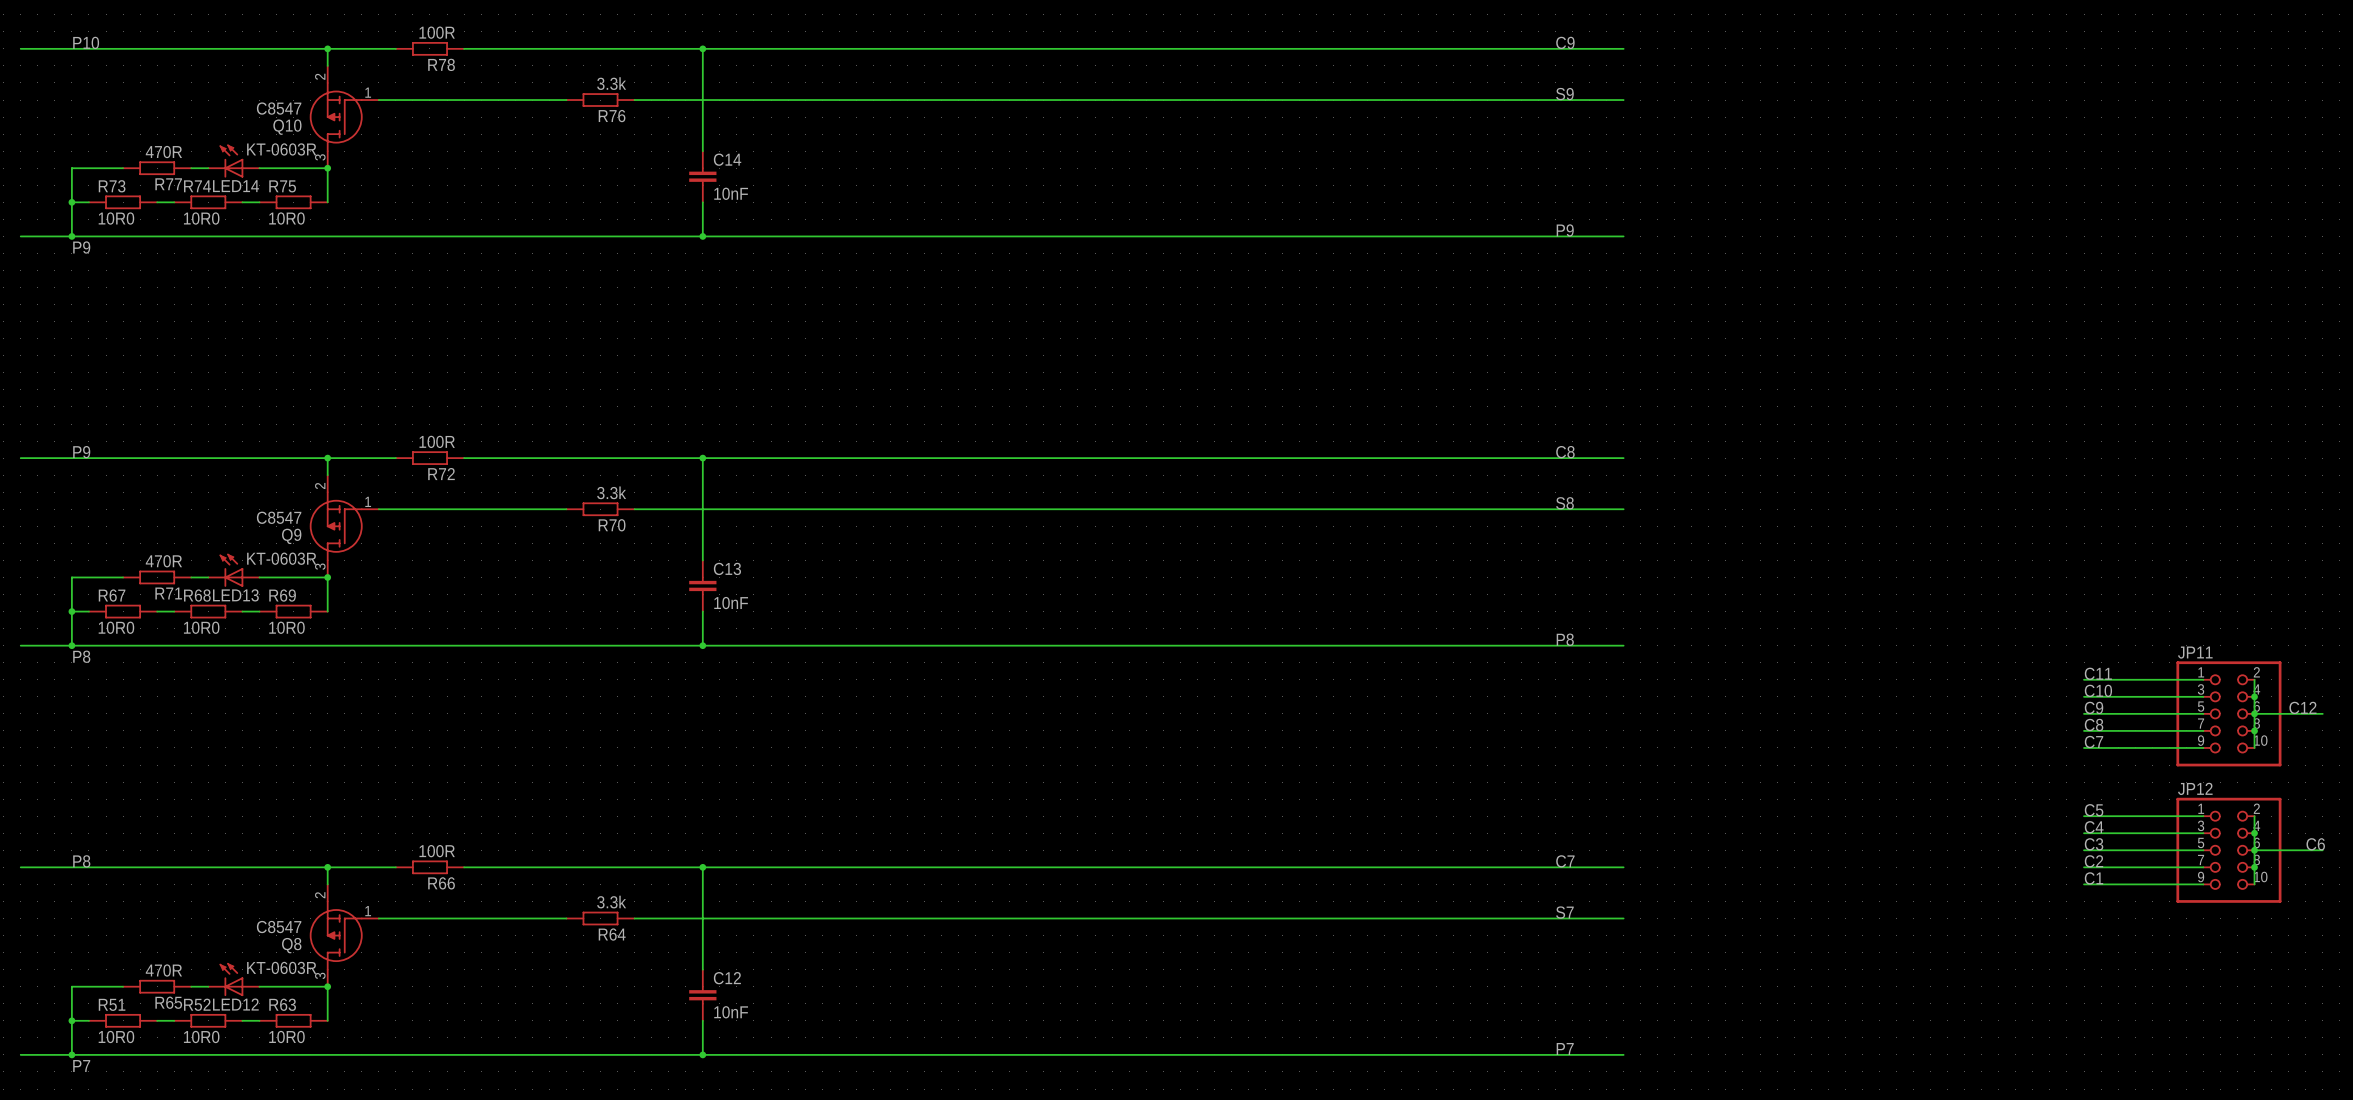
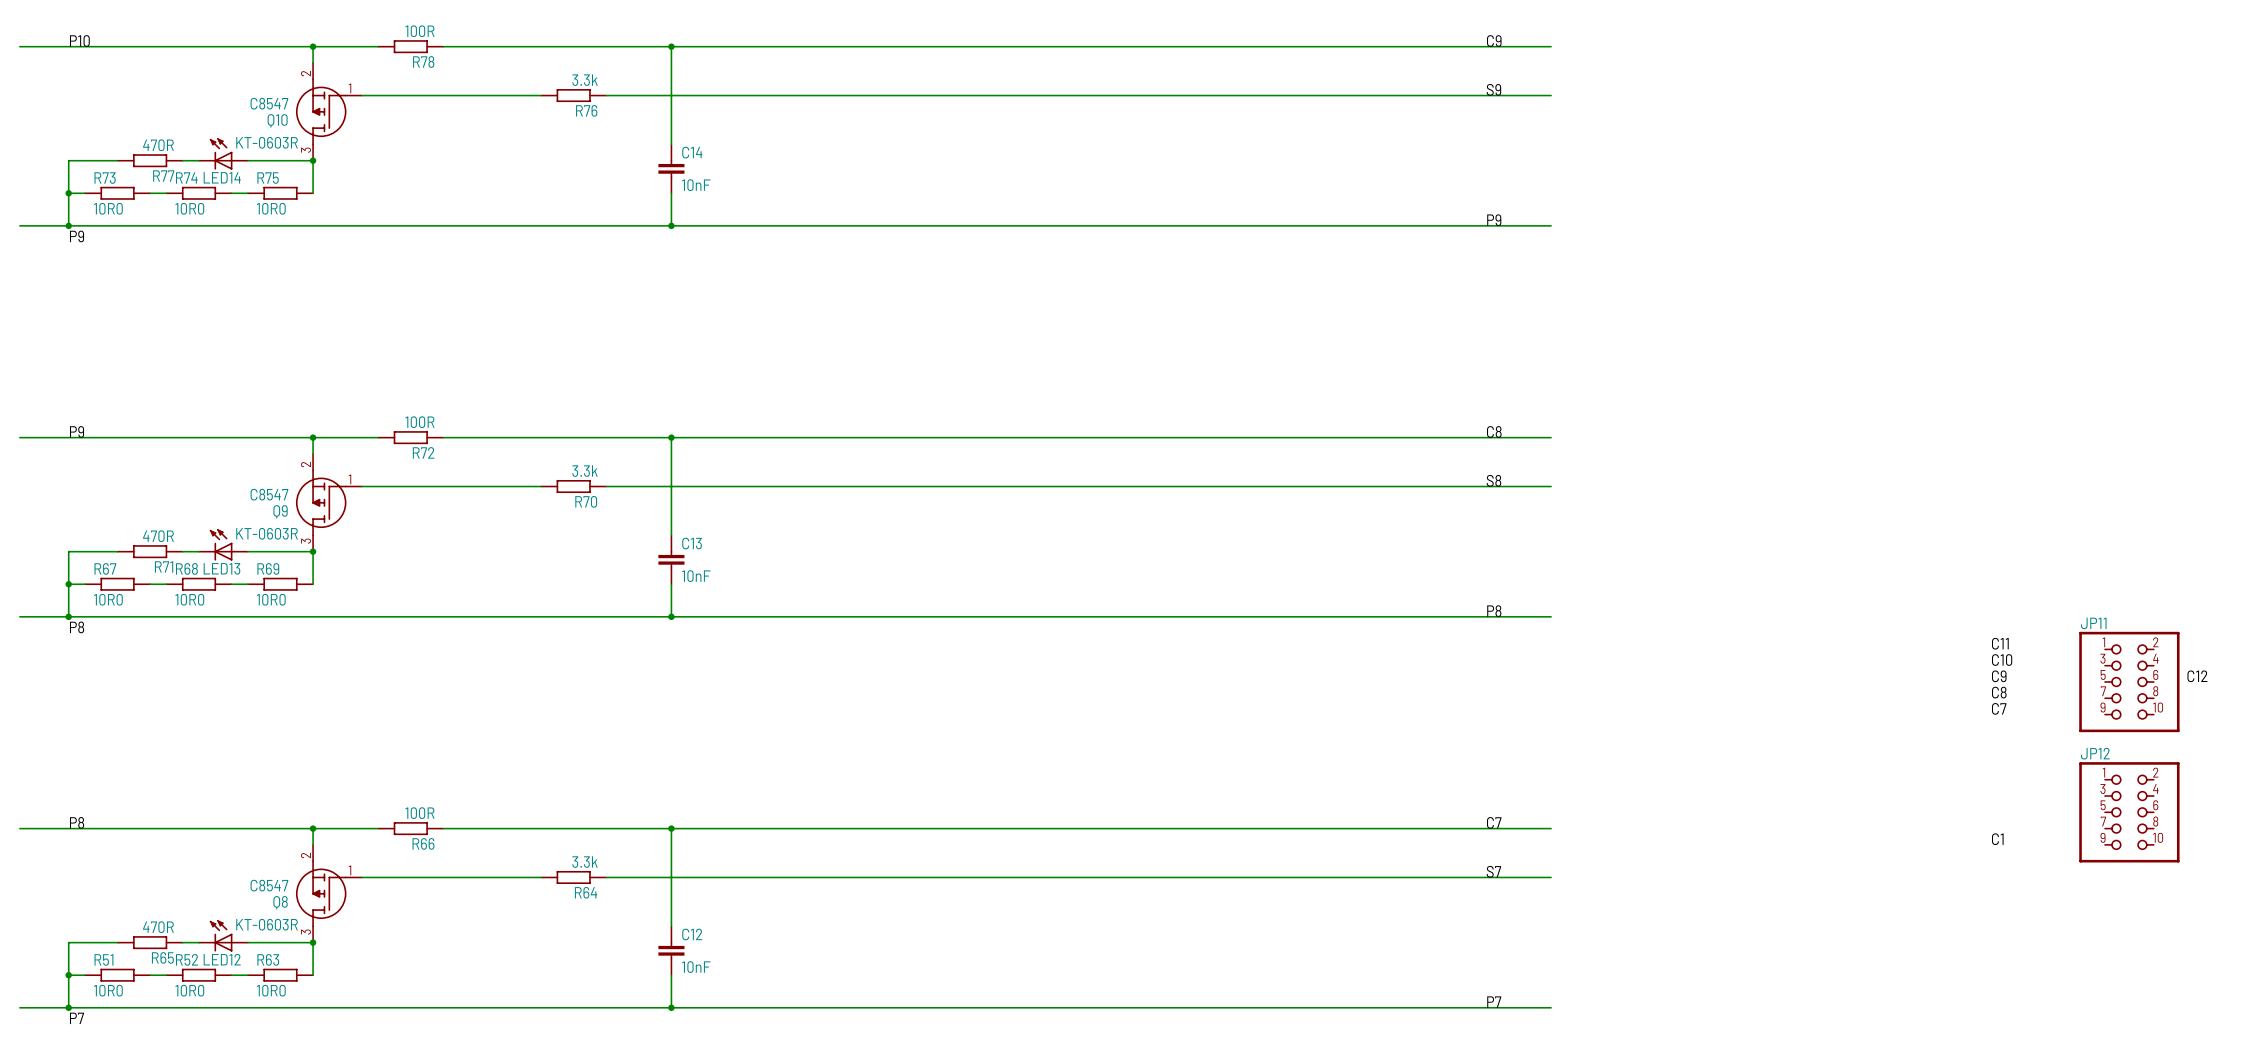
wire: (2084, 679) (2203, 679) -> none
wire: (2254, 679) (2254, 747) -> none
wire: (2084, 696) (2203, 696) -> none
junction: (2254, 696) -> none
wire: (2084, 713) (2203, 713) -> none
wire: (2254, 713) (2322, 713) -> none
junction: (2254, 713) -> none
wire: (2084, 730) (2203, 730) -> none
junction: (2254, 730) -> none
wire: (2084, 747) (2203, 747) -> none
label: C5 (2094, 810) -> none
wire: (2084, 816) (2203, 816) -> none
wire: (2254, 816) (2254, 884) -> none
label: C4 (2094, 827) -> none
wire: (2084, 833) (2203, 833) -> none
junction: (2254, 833) -> none
label: C3 (2094, 844) -> none
label: C6 (2315, 844) -> none
wire: (2084, 850) (2203, 850) -> none
wire: (2254, 850) (2322, 850) -> none
junction: (2254, 850) -> none
label: C2 (2093, 861) -> none
wire: (2084, 867) (2203, 867) -> none
junction: (2254, 867) -> none
wire: (2084, 884) (2203, 884) -> none

